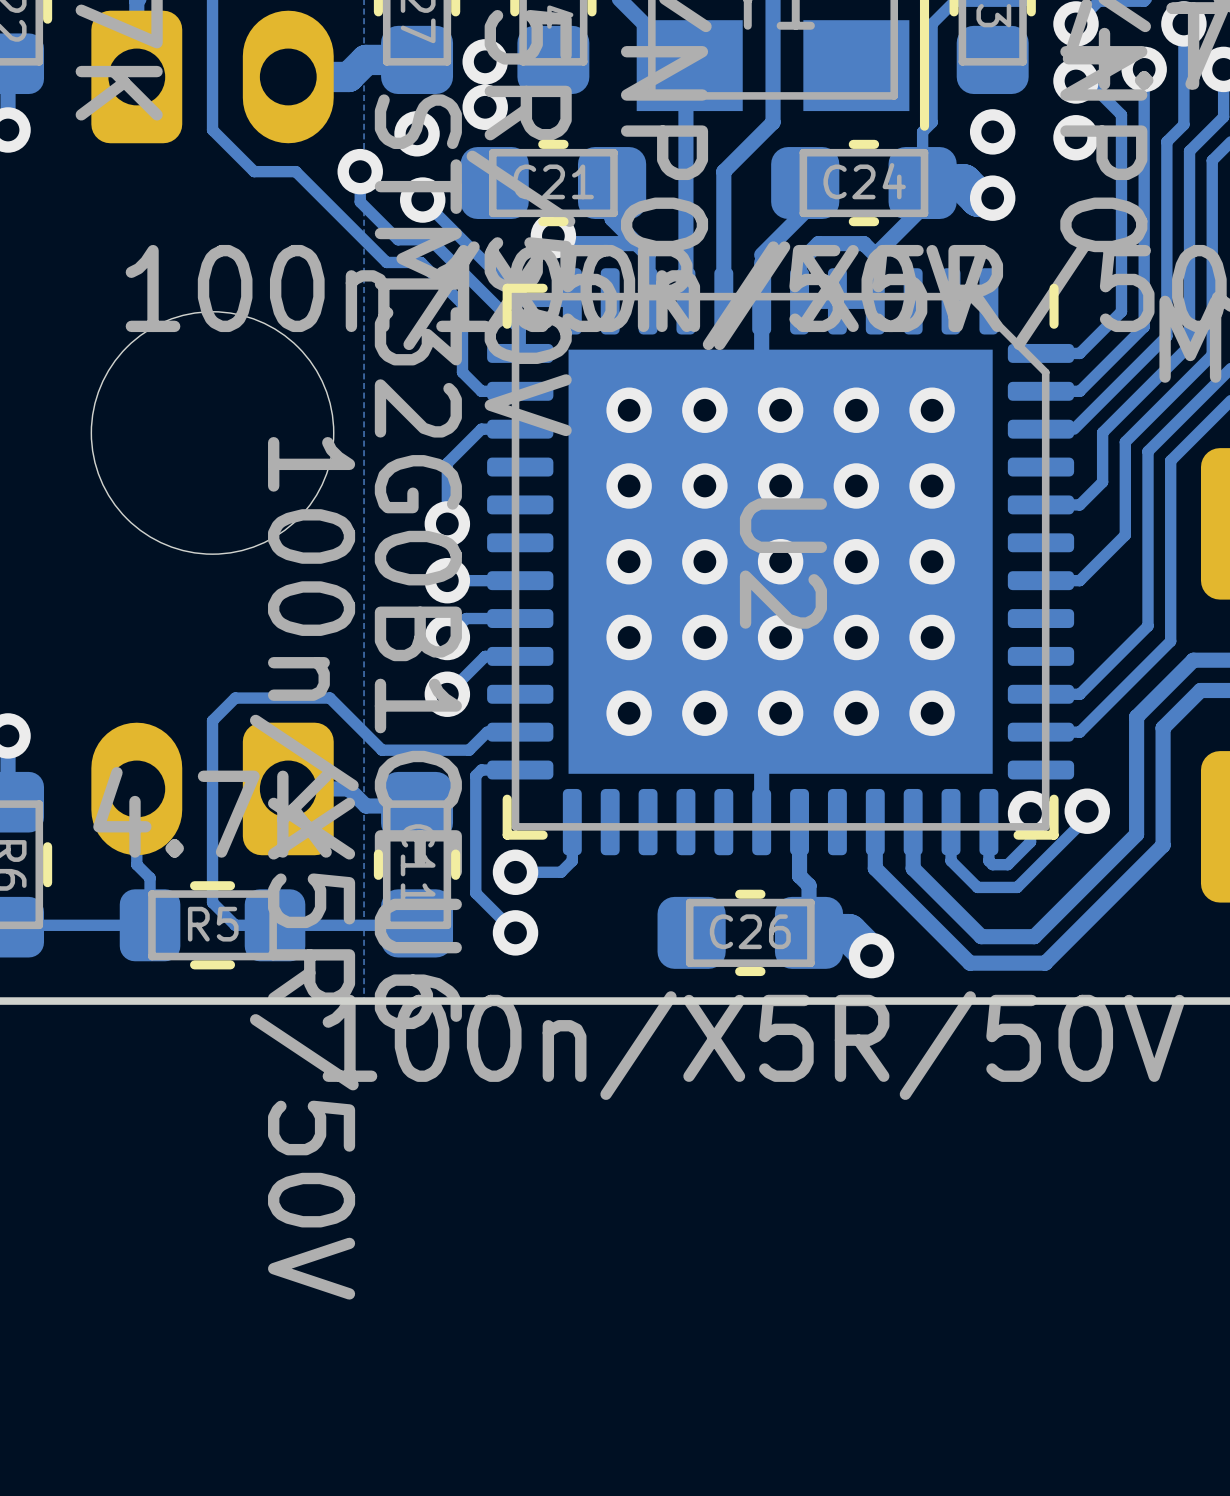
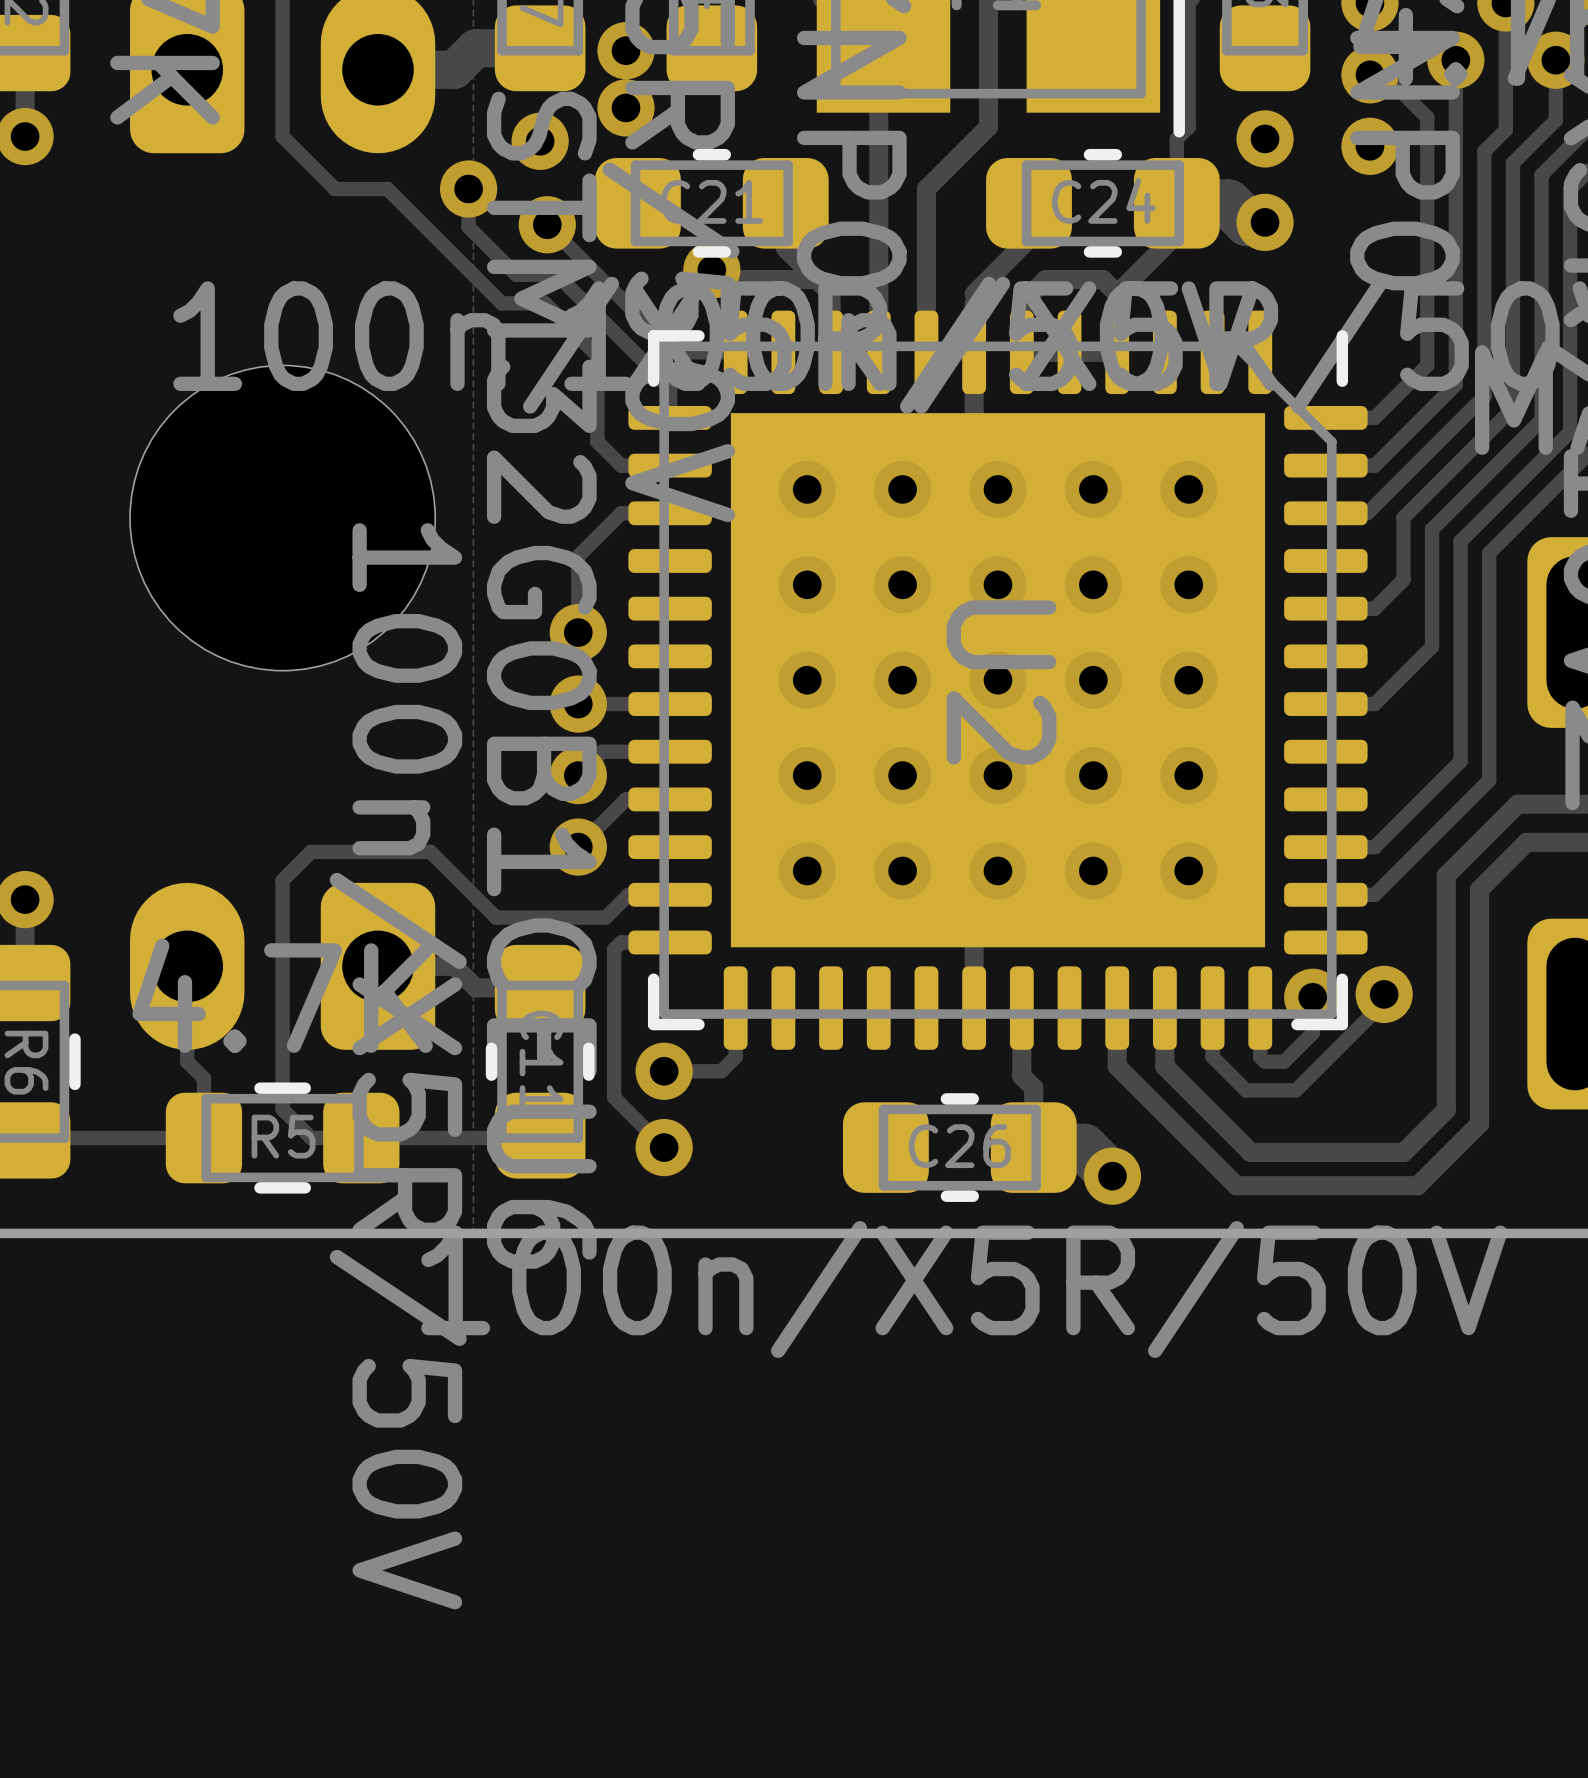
track: (1136, 834) (1034, 936) -> (1446, 1023) (1446, 1109) (1403, 1152) (1317, 1152)
track: (1163, 845) (1045, 963) -> (1479, 1037) (1479, 1123) (1417, 1185) (1331, 1185)

